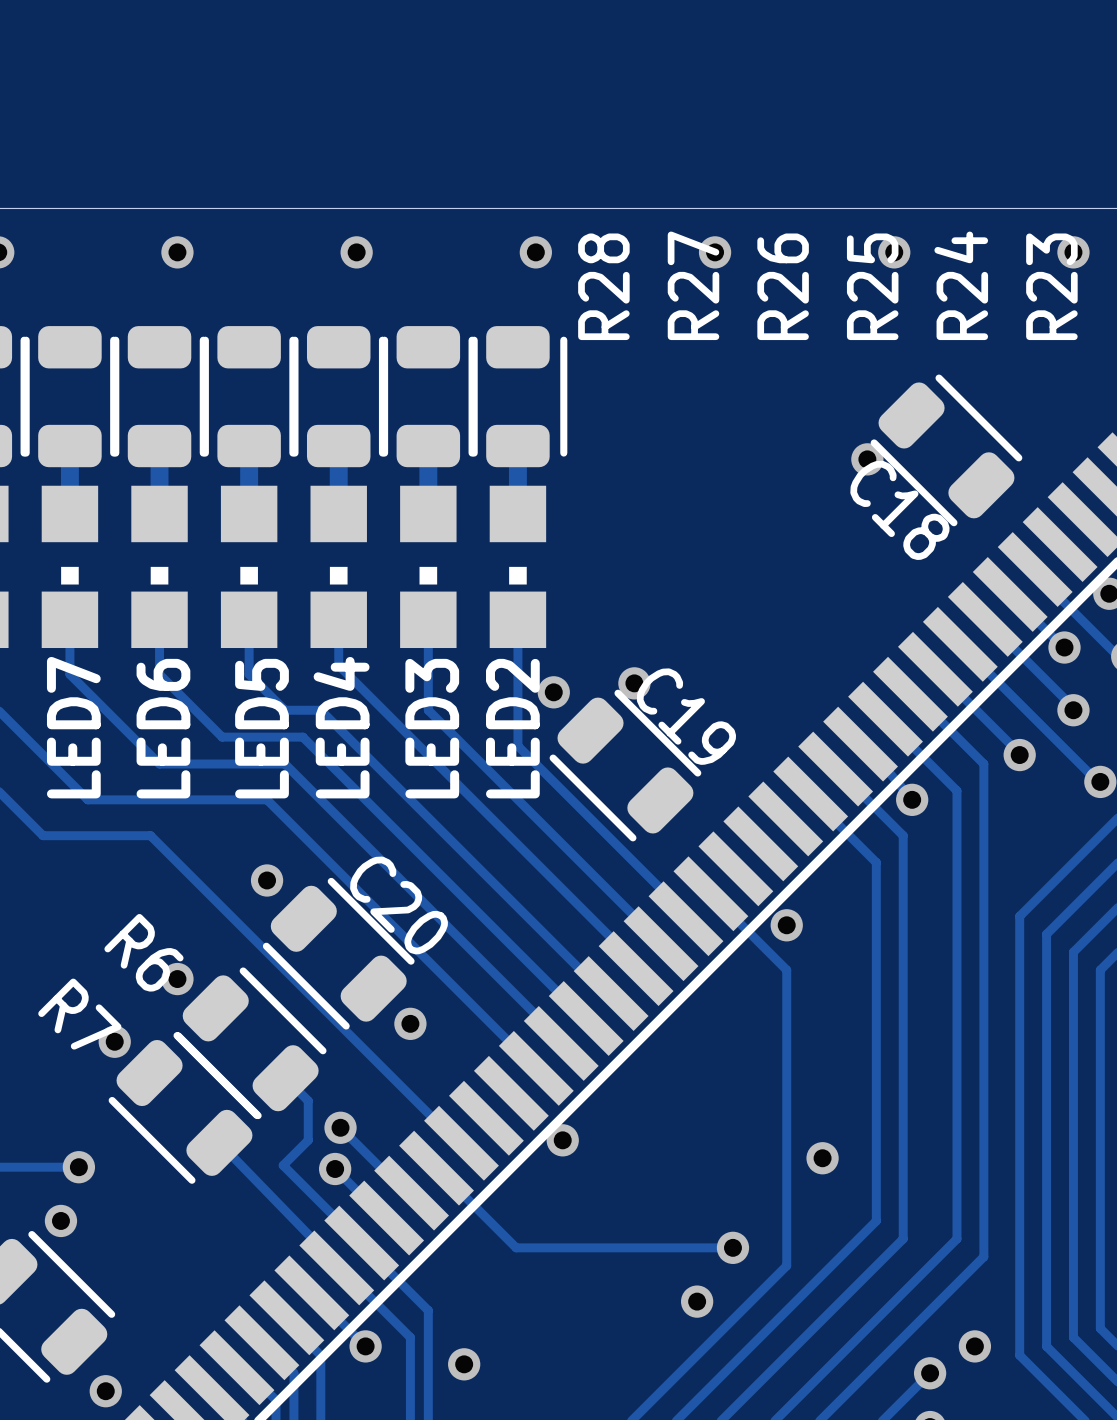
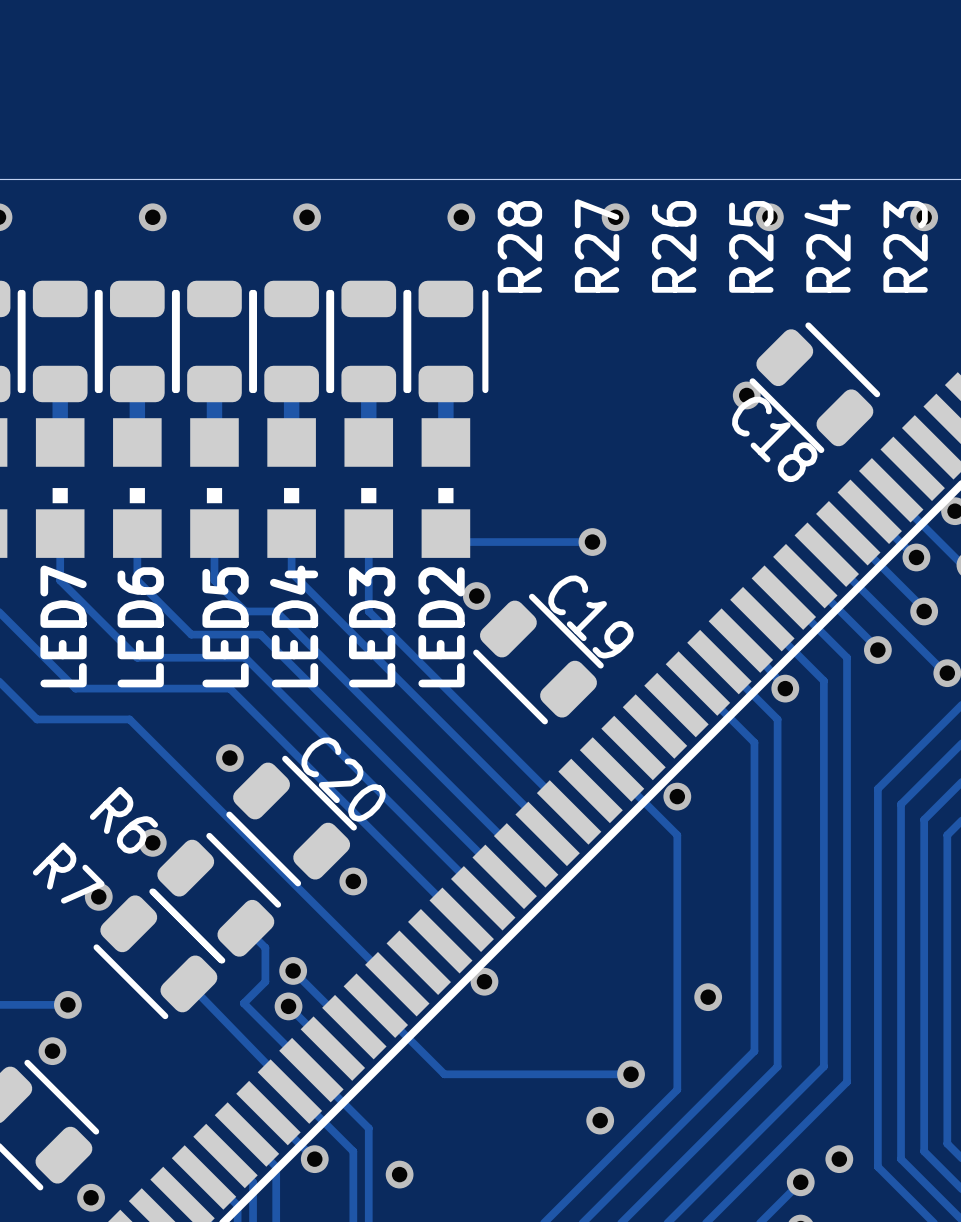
track: (517, 629) (517, 746) (685, 914) (685, 918) -> (445, 542) (592, 542)
via position: (634, 683) -> (592, 542)

